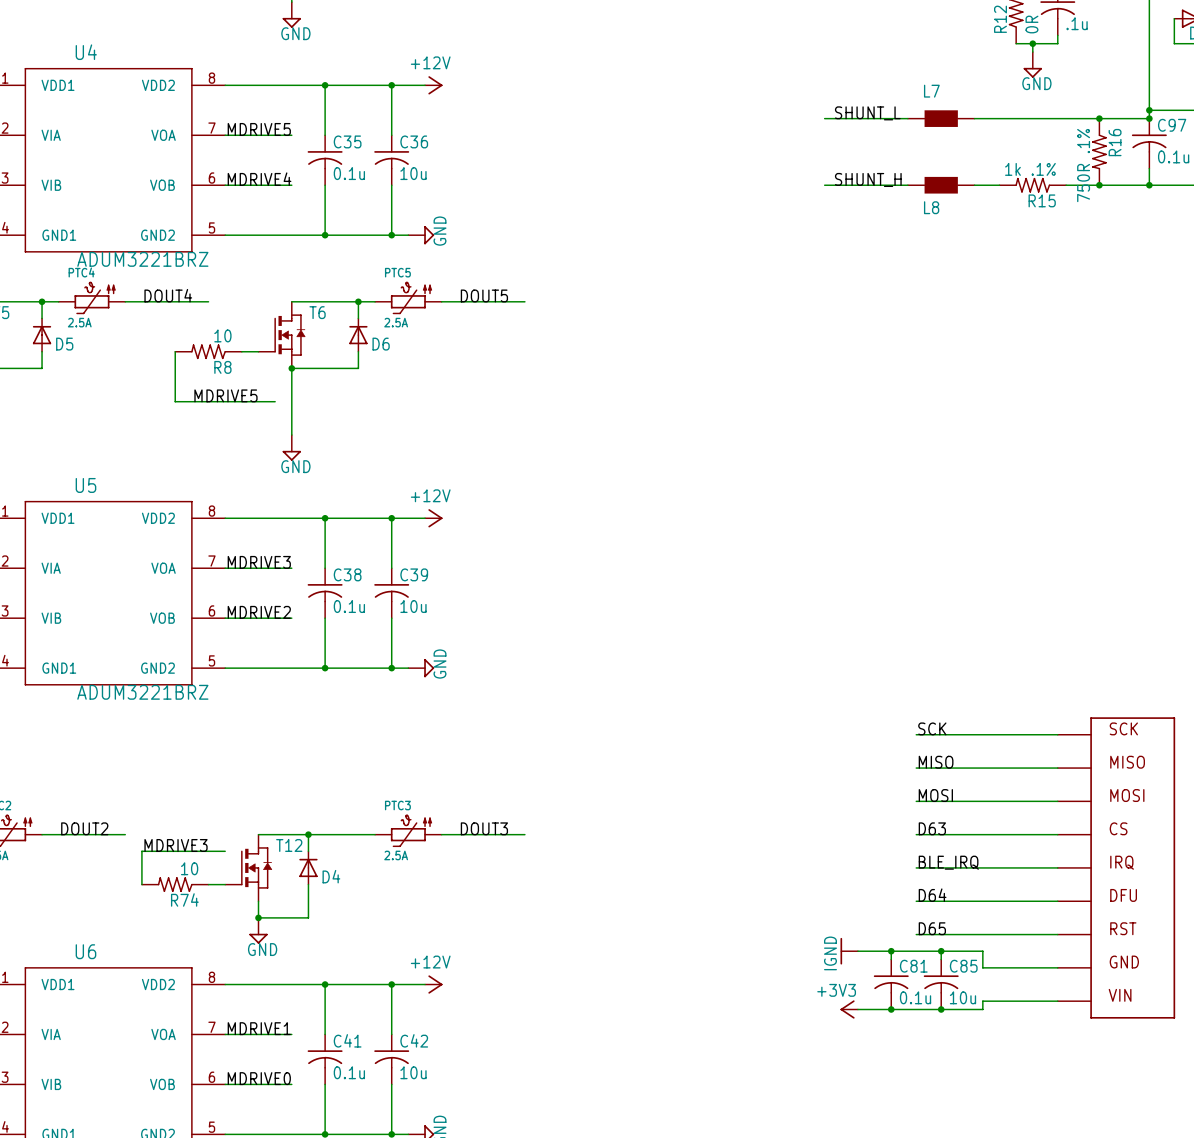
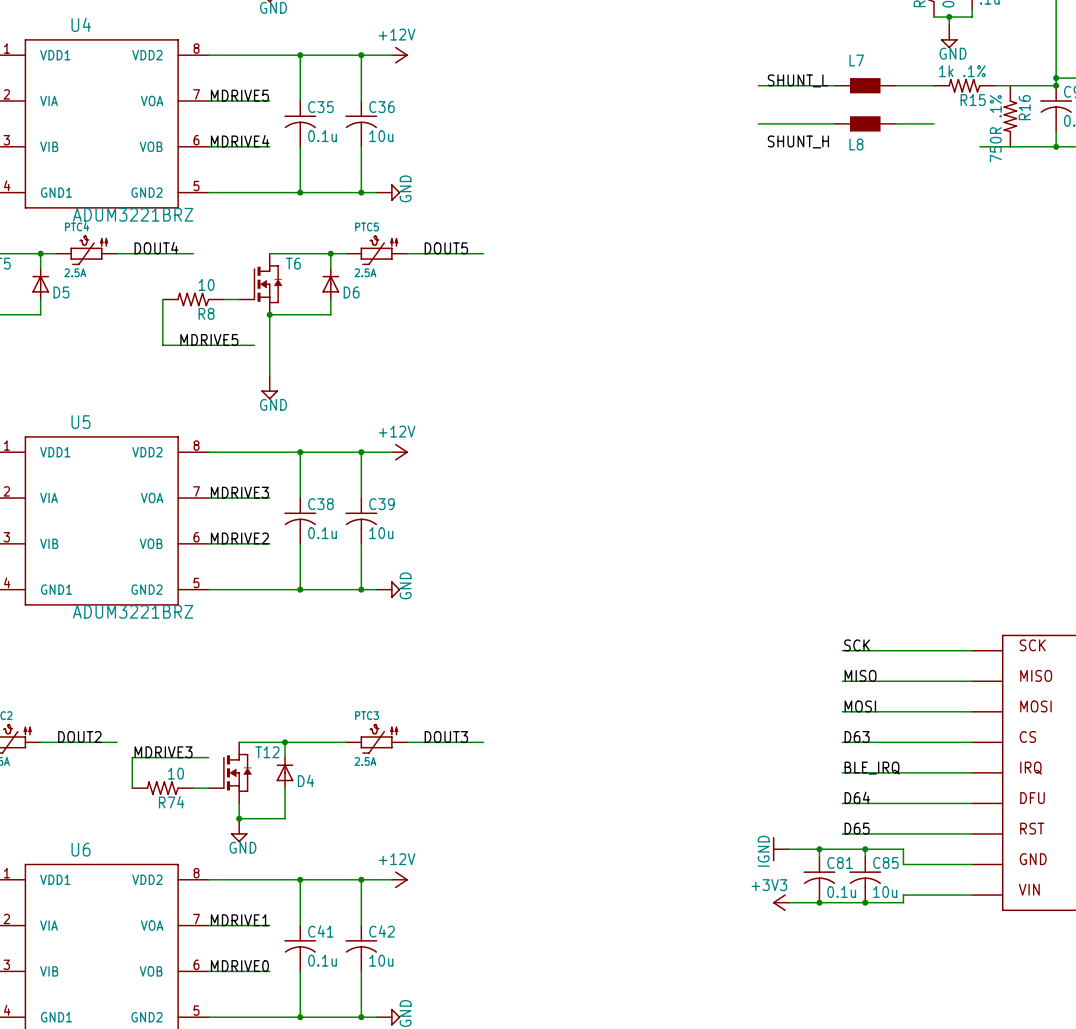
junction: (1099, 118) -> none
wire: none -> (895, 123) (933, 123)
wire: (824, 185) (907, 185) -> (758, 123) (834, 123)
L8 position: (941, 185) -> (865, 123)
wire: (974, 185) (999, 185) -> none
R15 position: (1032, 185) -> (964, 85)
junction: (1099, 185) -> none

